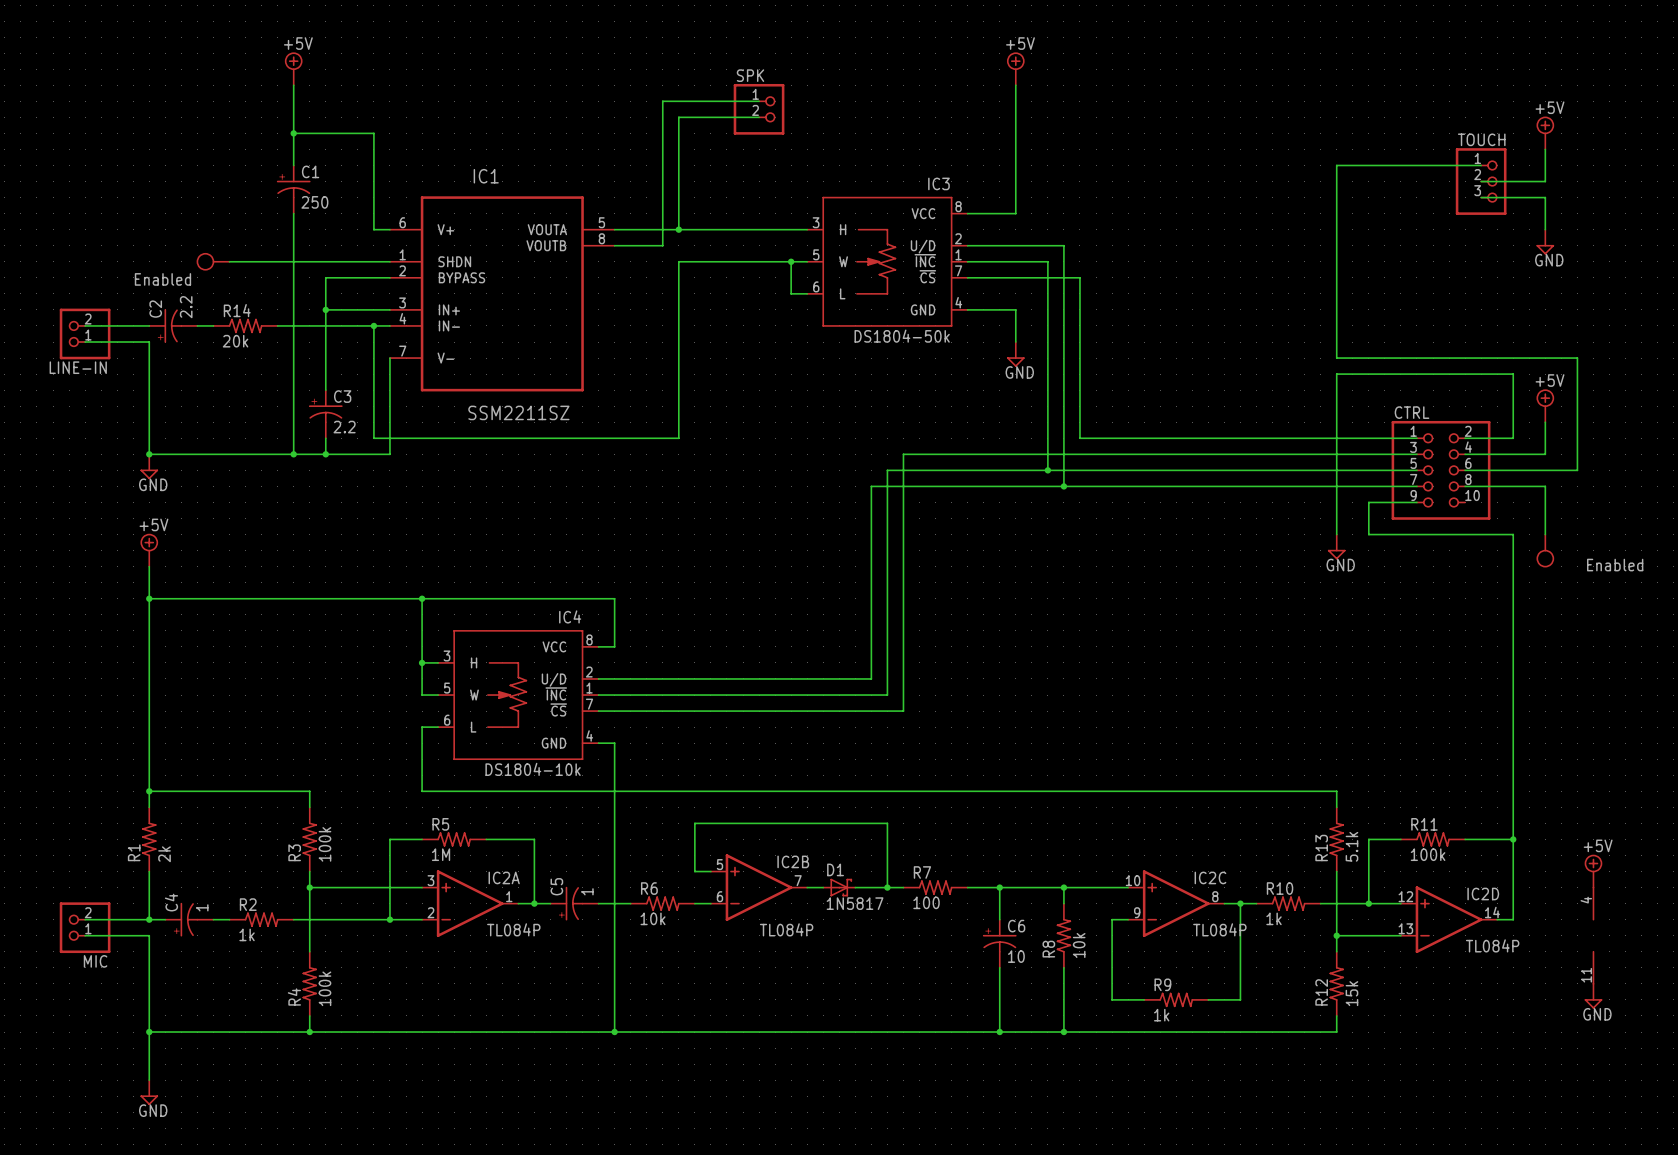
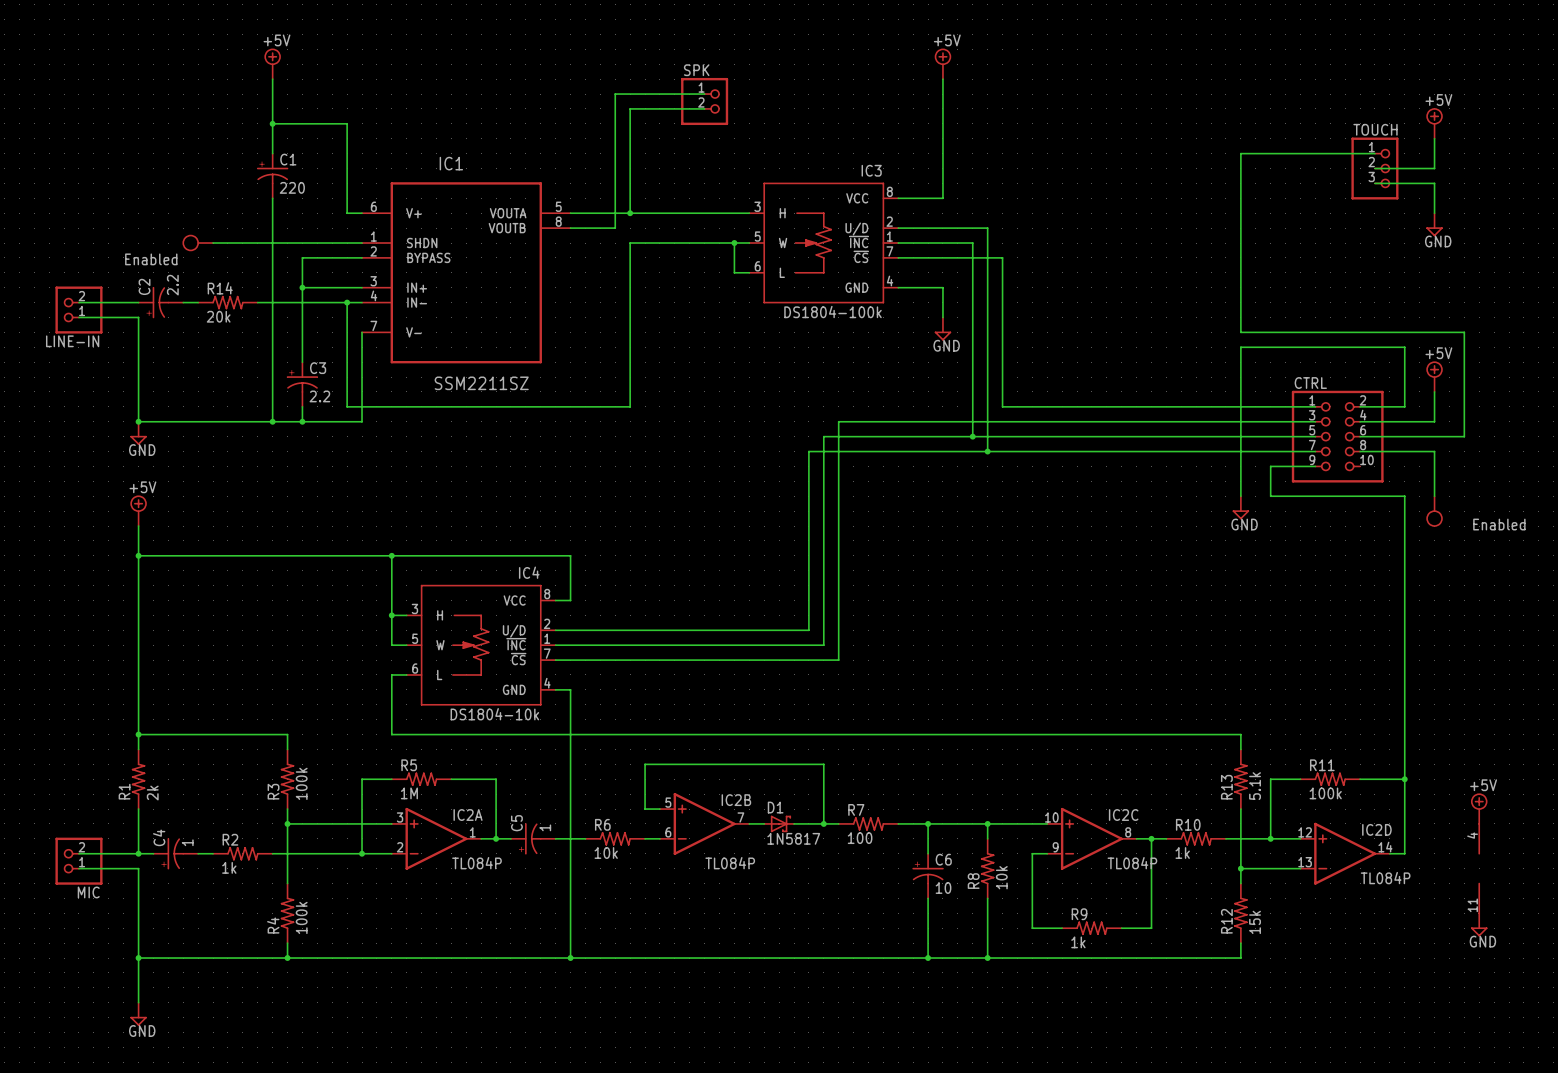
C1 value: 250 (314, 202) -> 220 (292, 187)
IC3 value: DS1804-50k (902, 336) -> DS1804-100k (833, 312)

